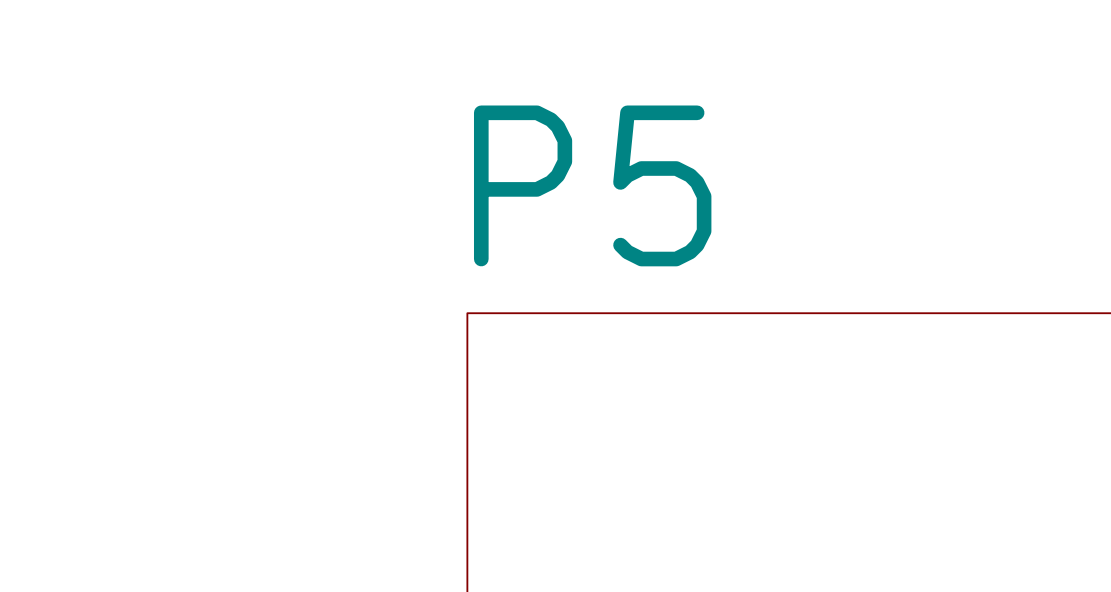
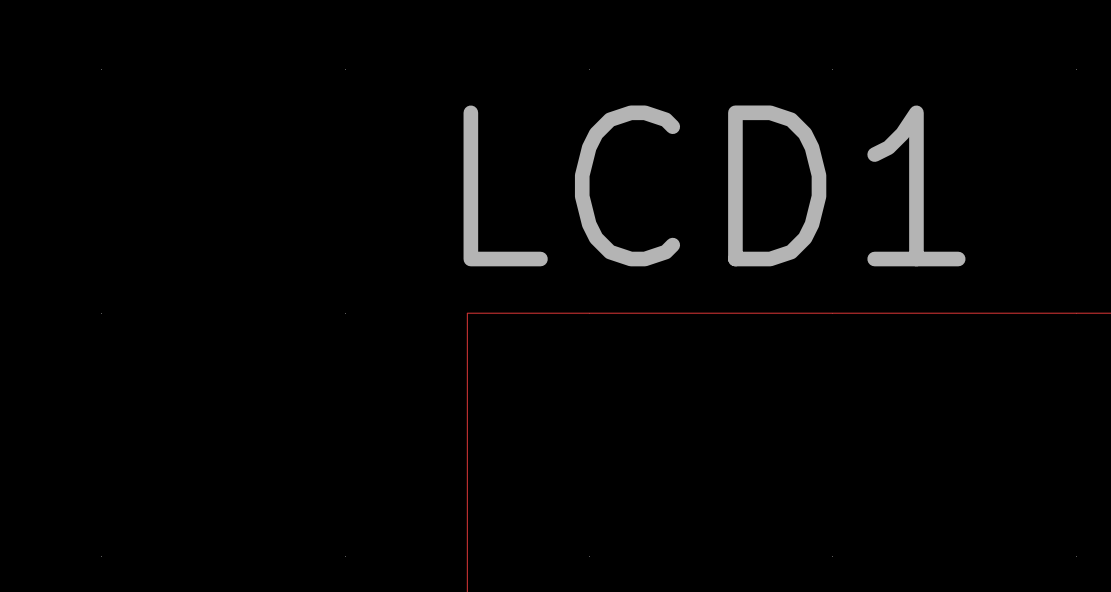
P5 name: P5 (592, 185) -> LCD1 (714, 185)

